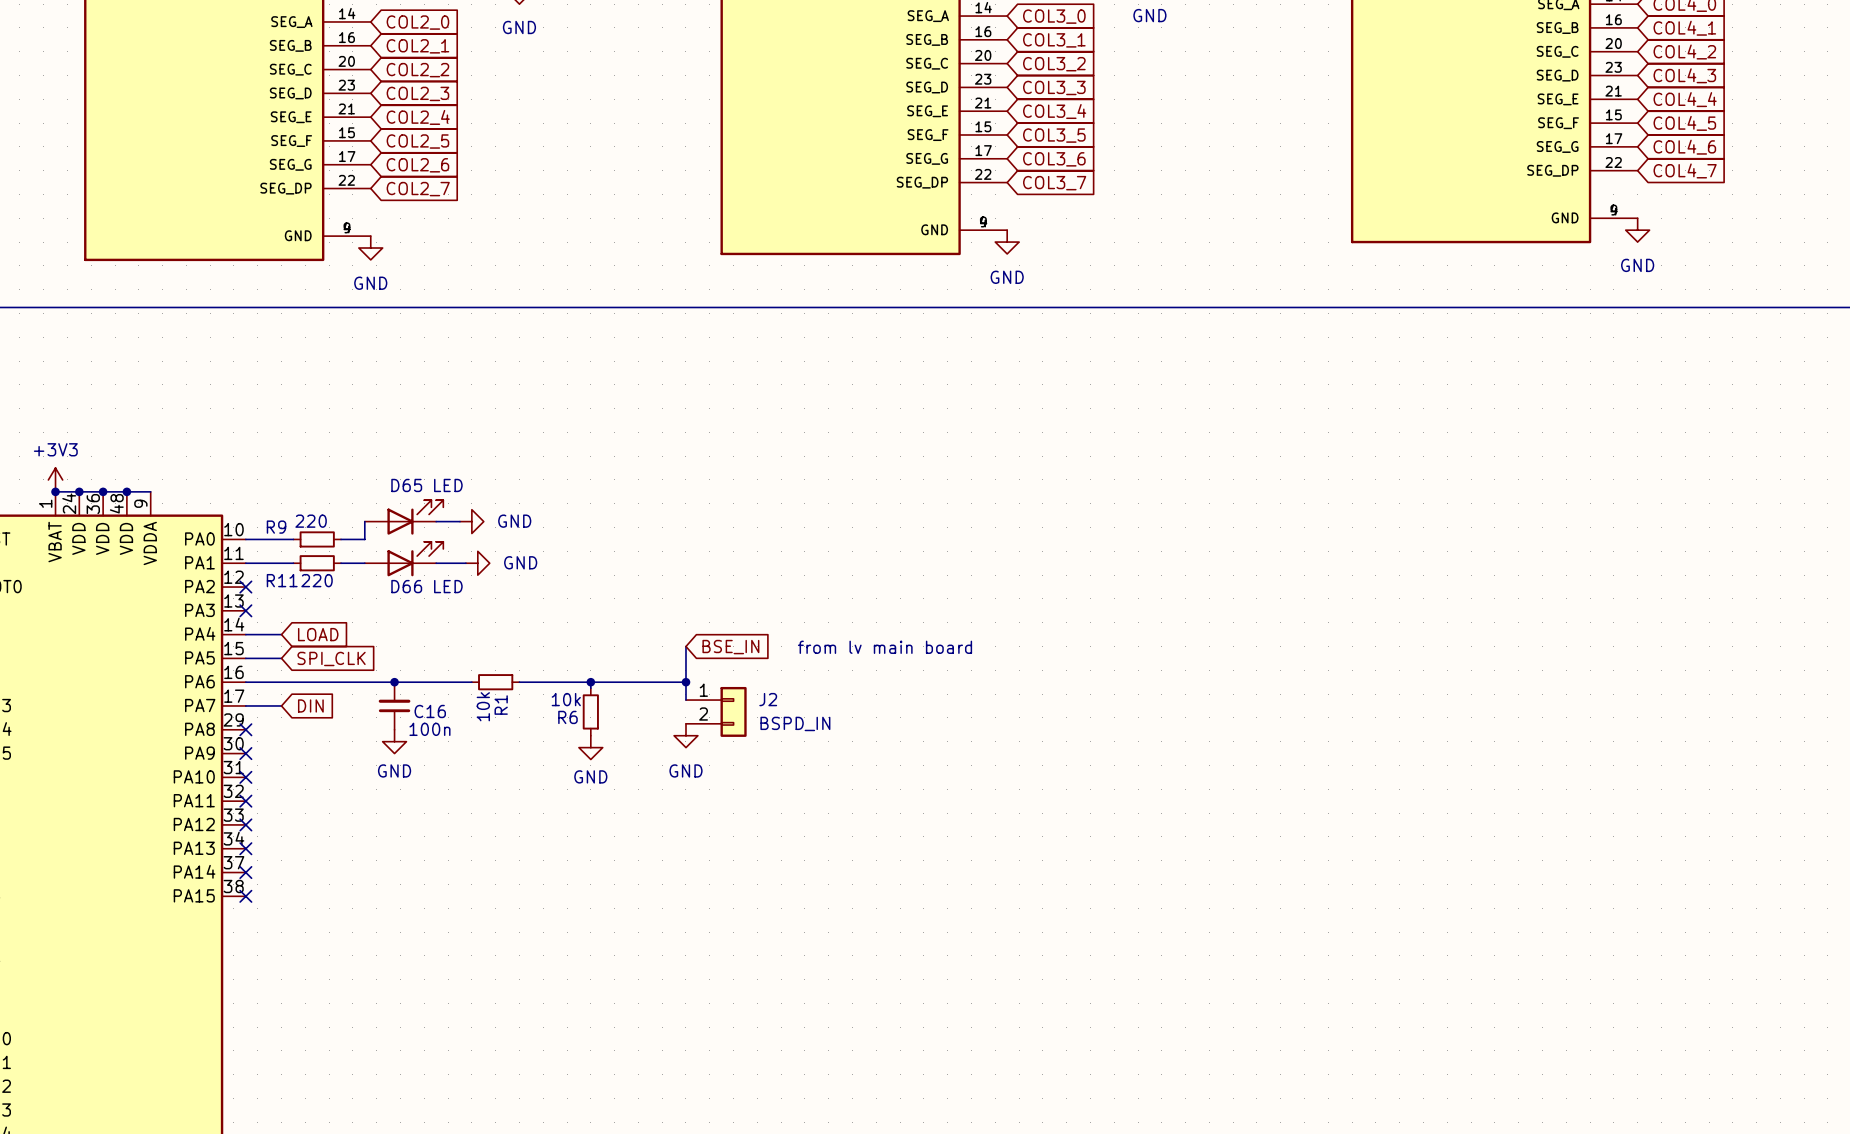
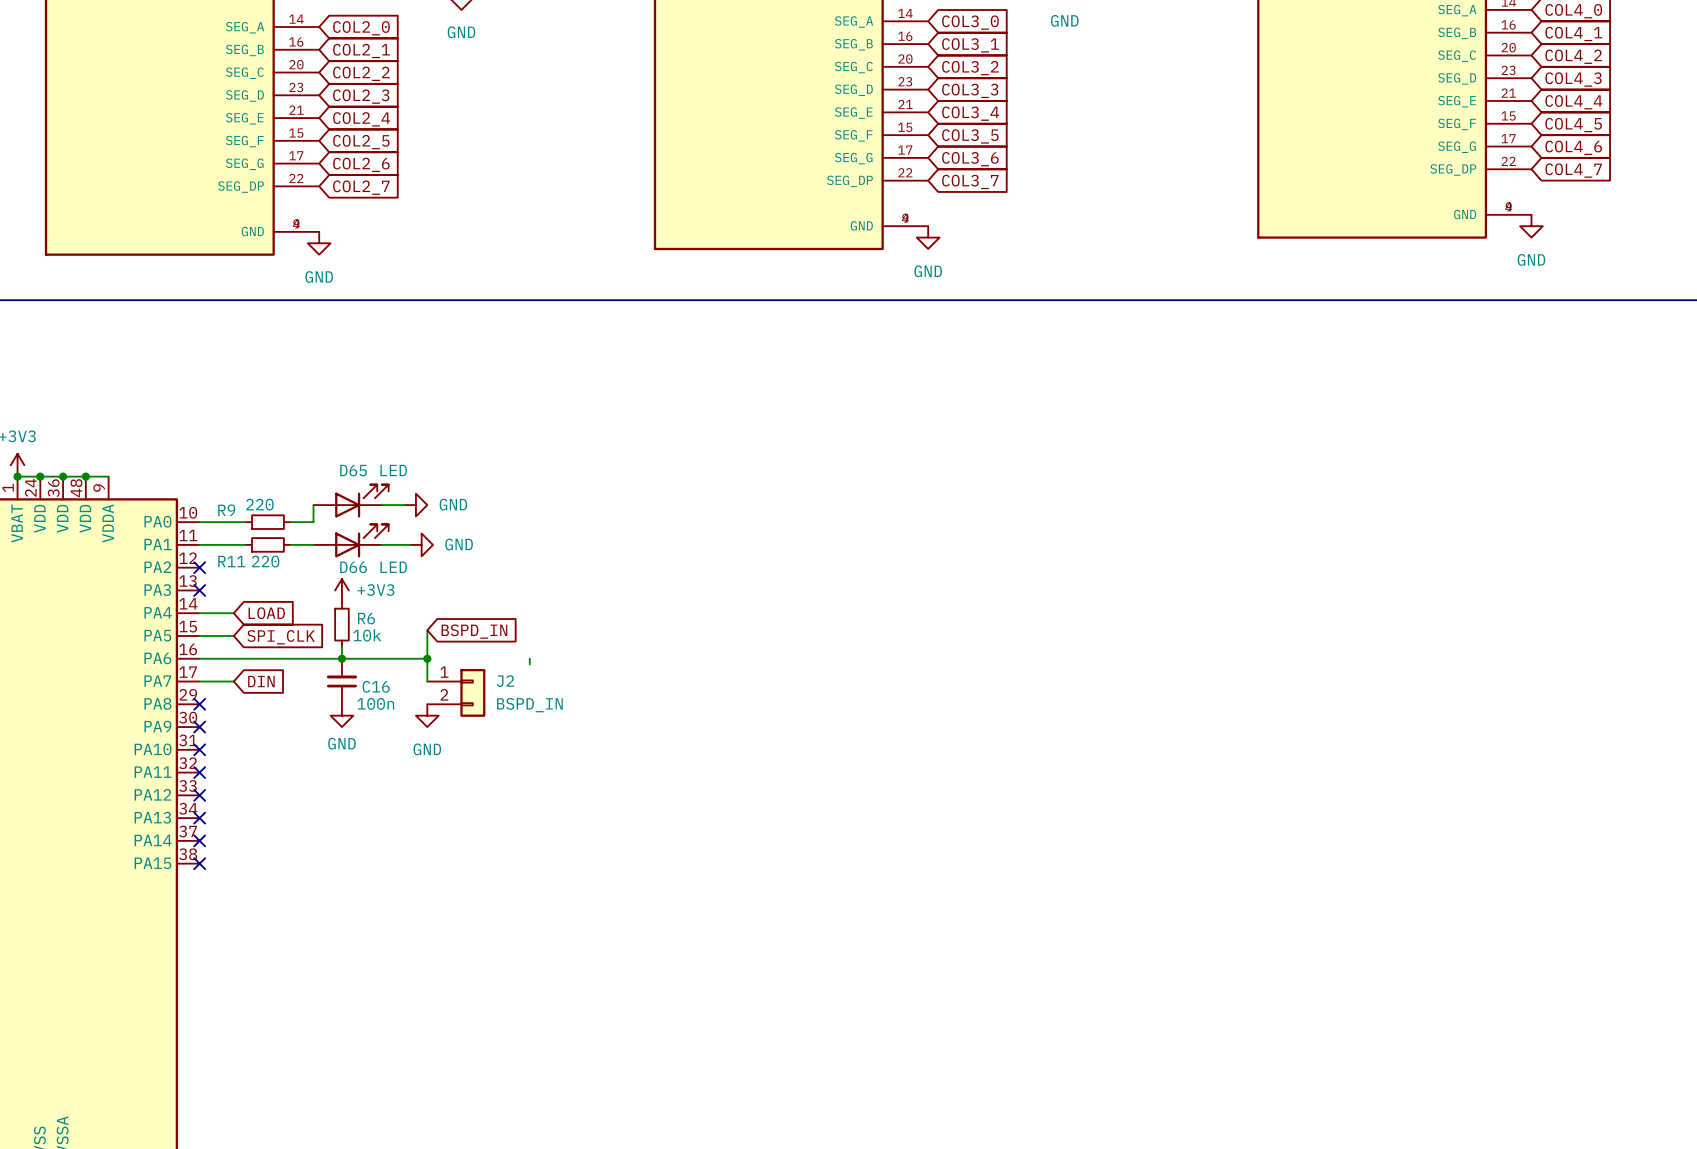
power symbol: none -> +3V3 (341, 590)
wire: (685, 646) (685, 700) -> (427, 630) (427, 681)
global label: BSE_IN (730, 647) -> none
text: from lv main board (884, 647) -> none
global label: none -> BSPD_IN (474, 631)
wire: none -> (341, 647) (341, 658)
junction: none -> (427, 658)
R1: 10k (495, 682) -> none
wire: (519, 682) (685, 682) -> none
junction: (590, 682) -> none
junction: (685, 682) -> none
R6 value position: 10k (566, 699) -> 10k (367, 635)
R6 position: (590, 711) -> (341, 624)
J2 position: (716, 711) -> (456, 692)
R6 name position: R6 (567, 717) -> R6 (366, 618)
power symbol: GND (685, 735) -> none
power symbol: none -> GND (427, 715)
power symbol: GND (590, 747) -> none

